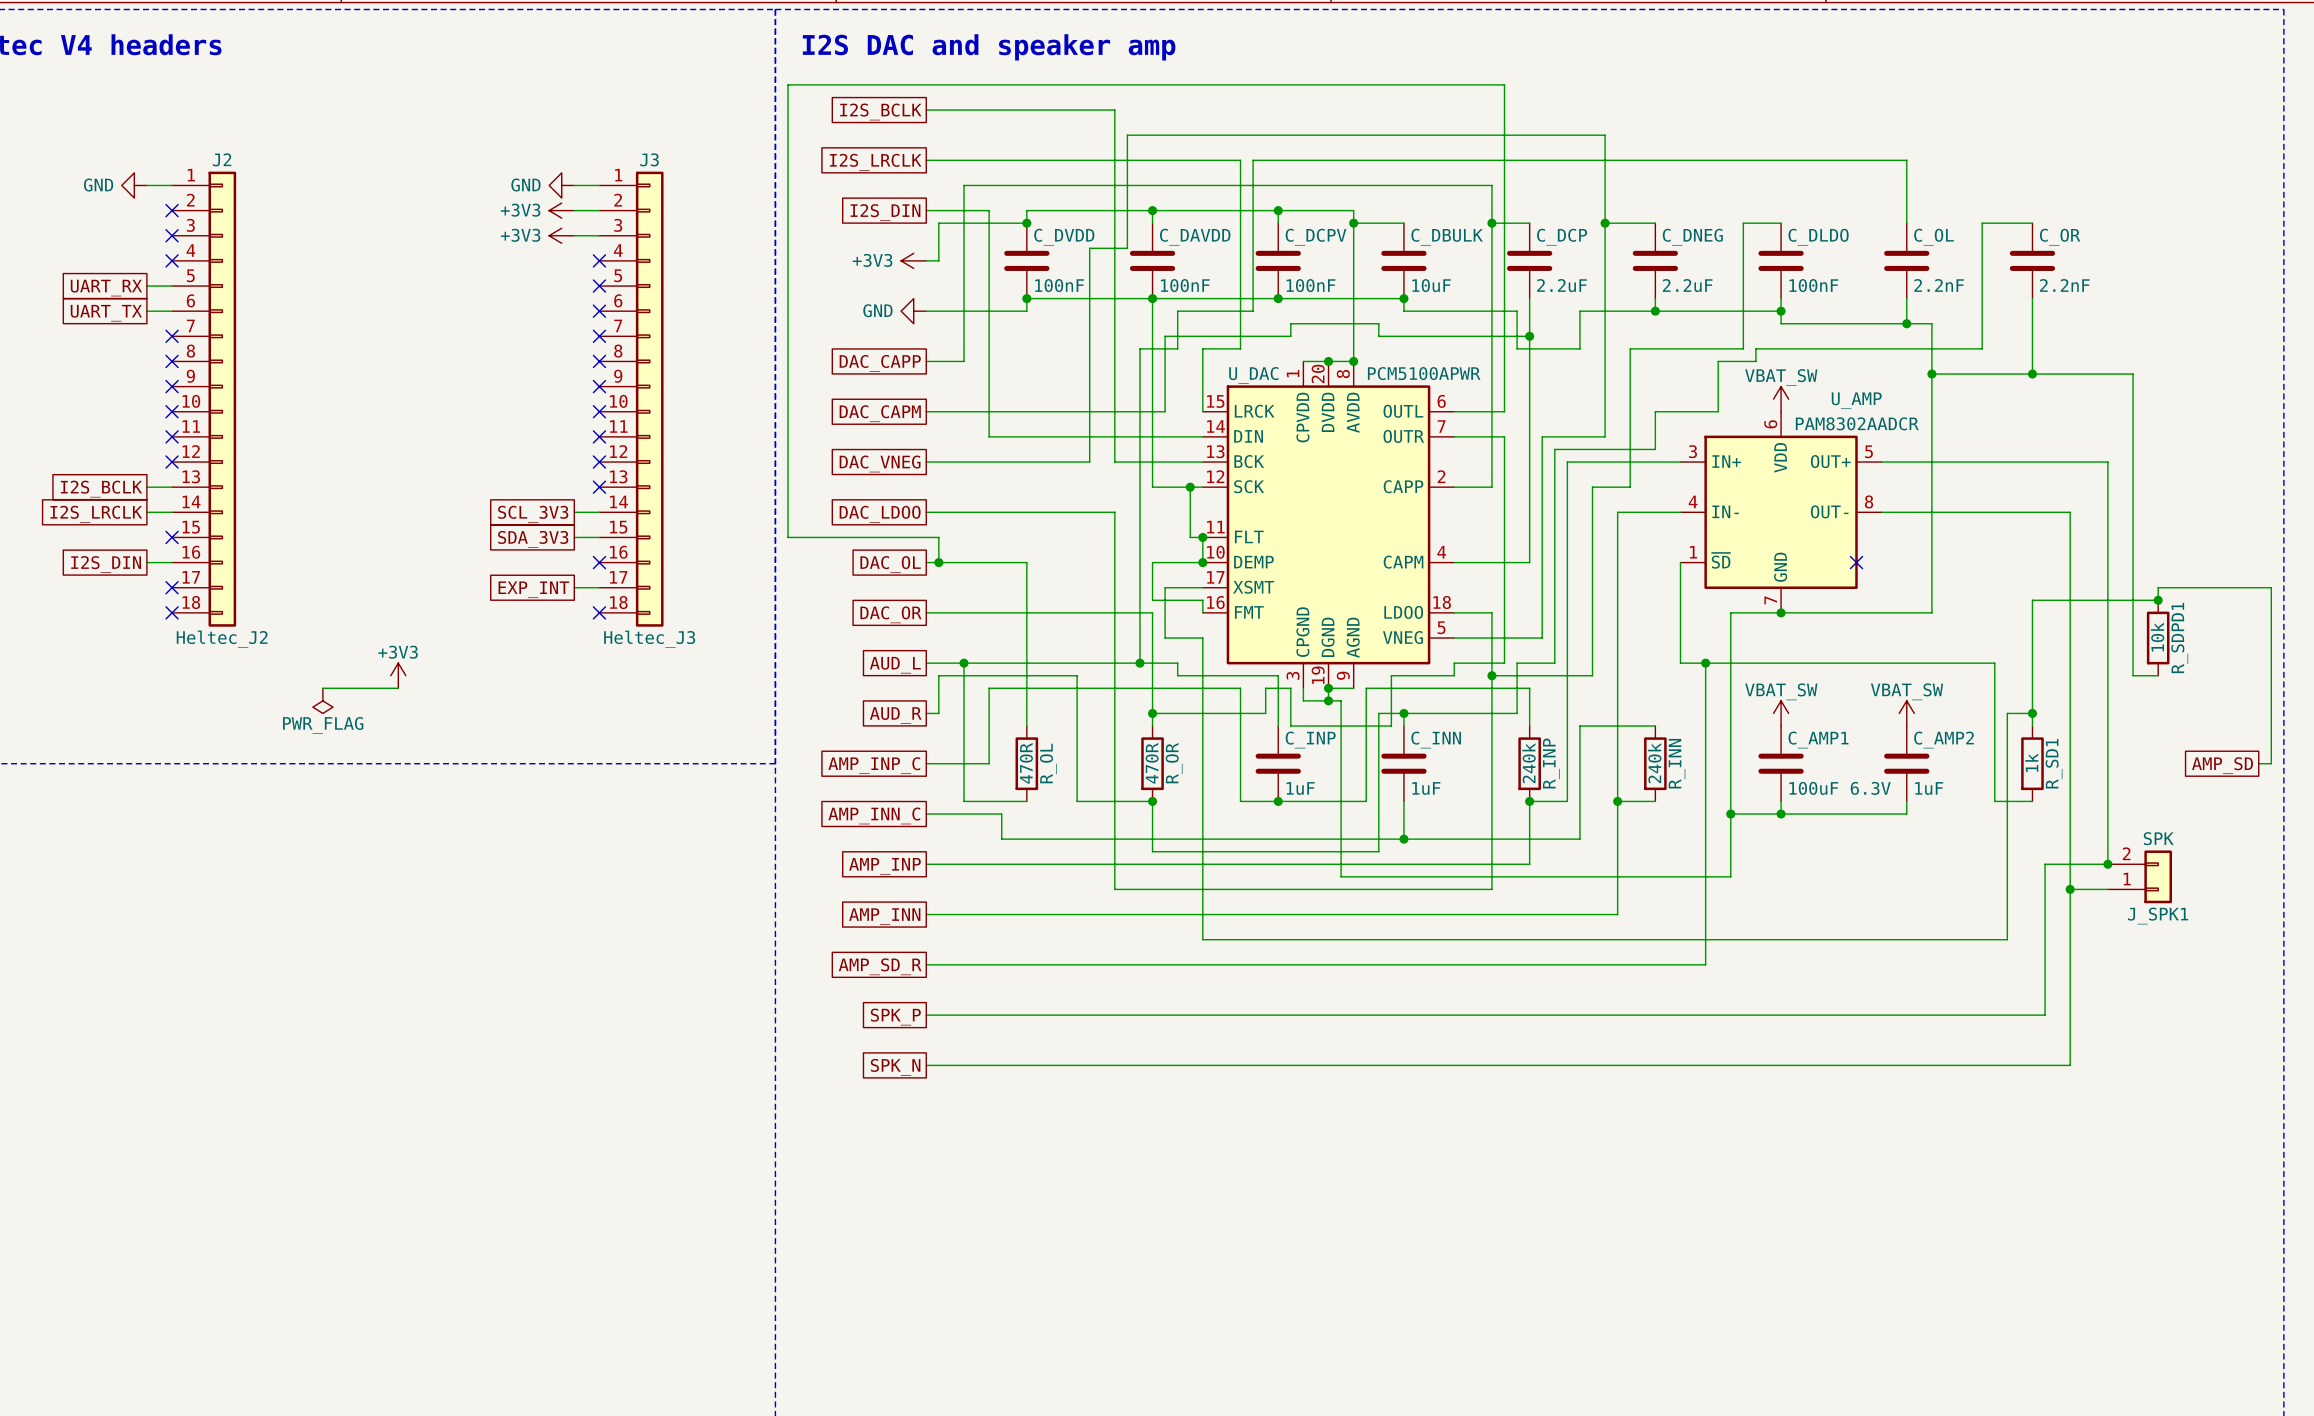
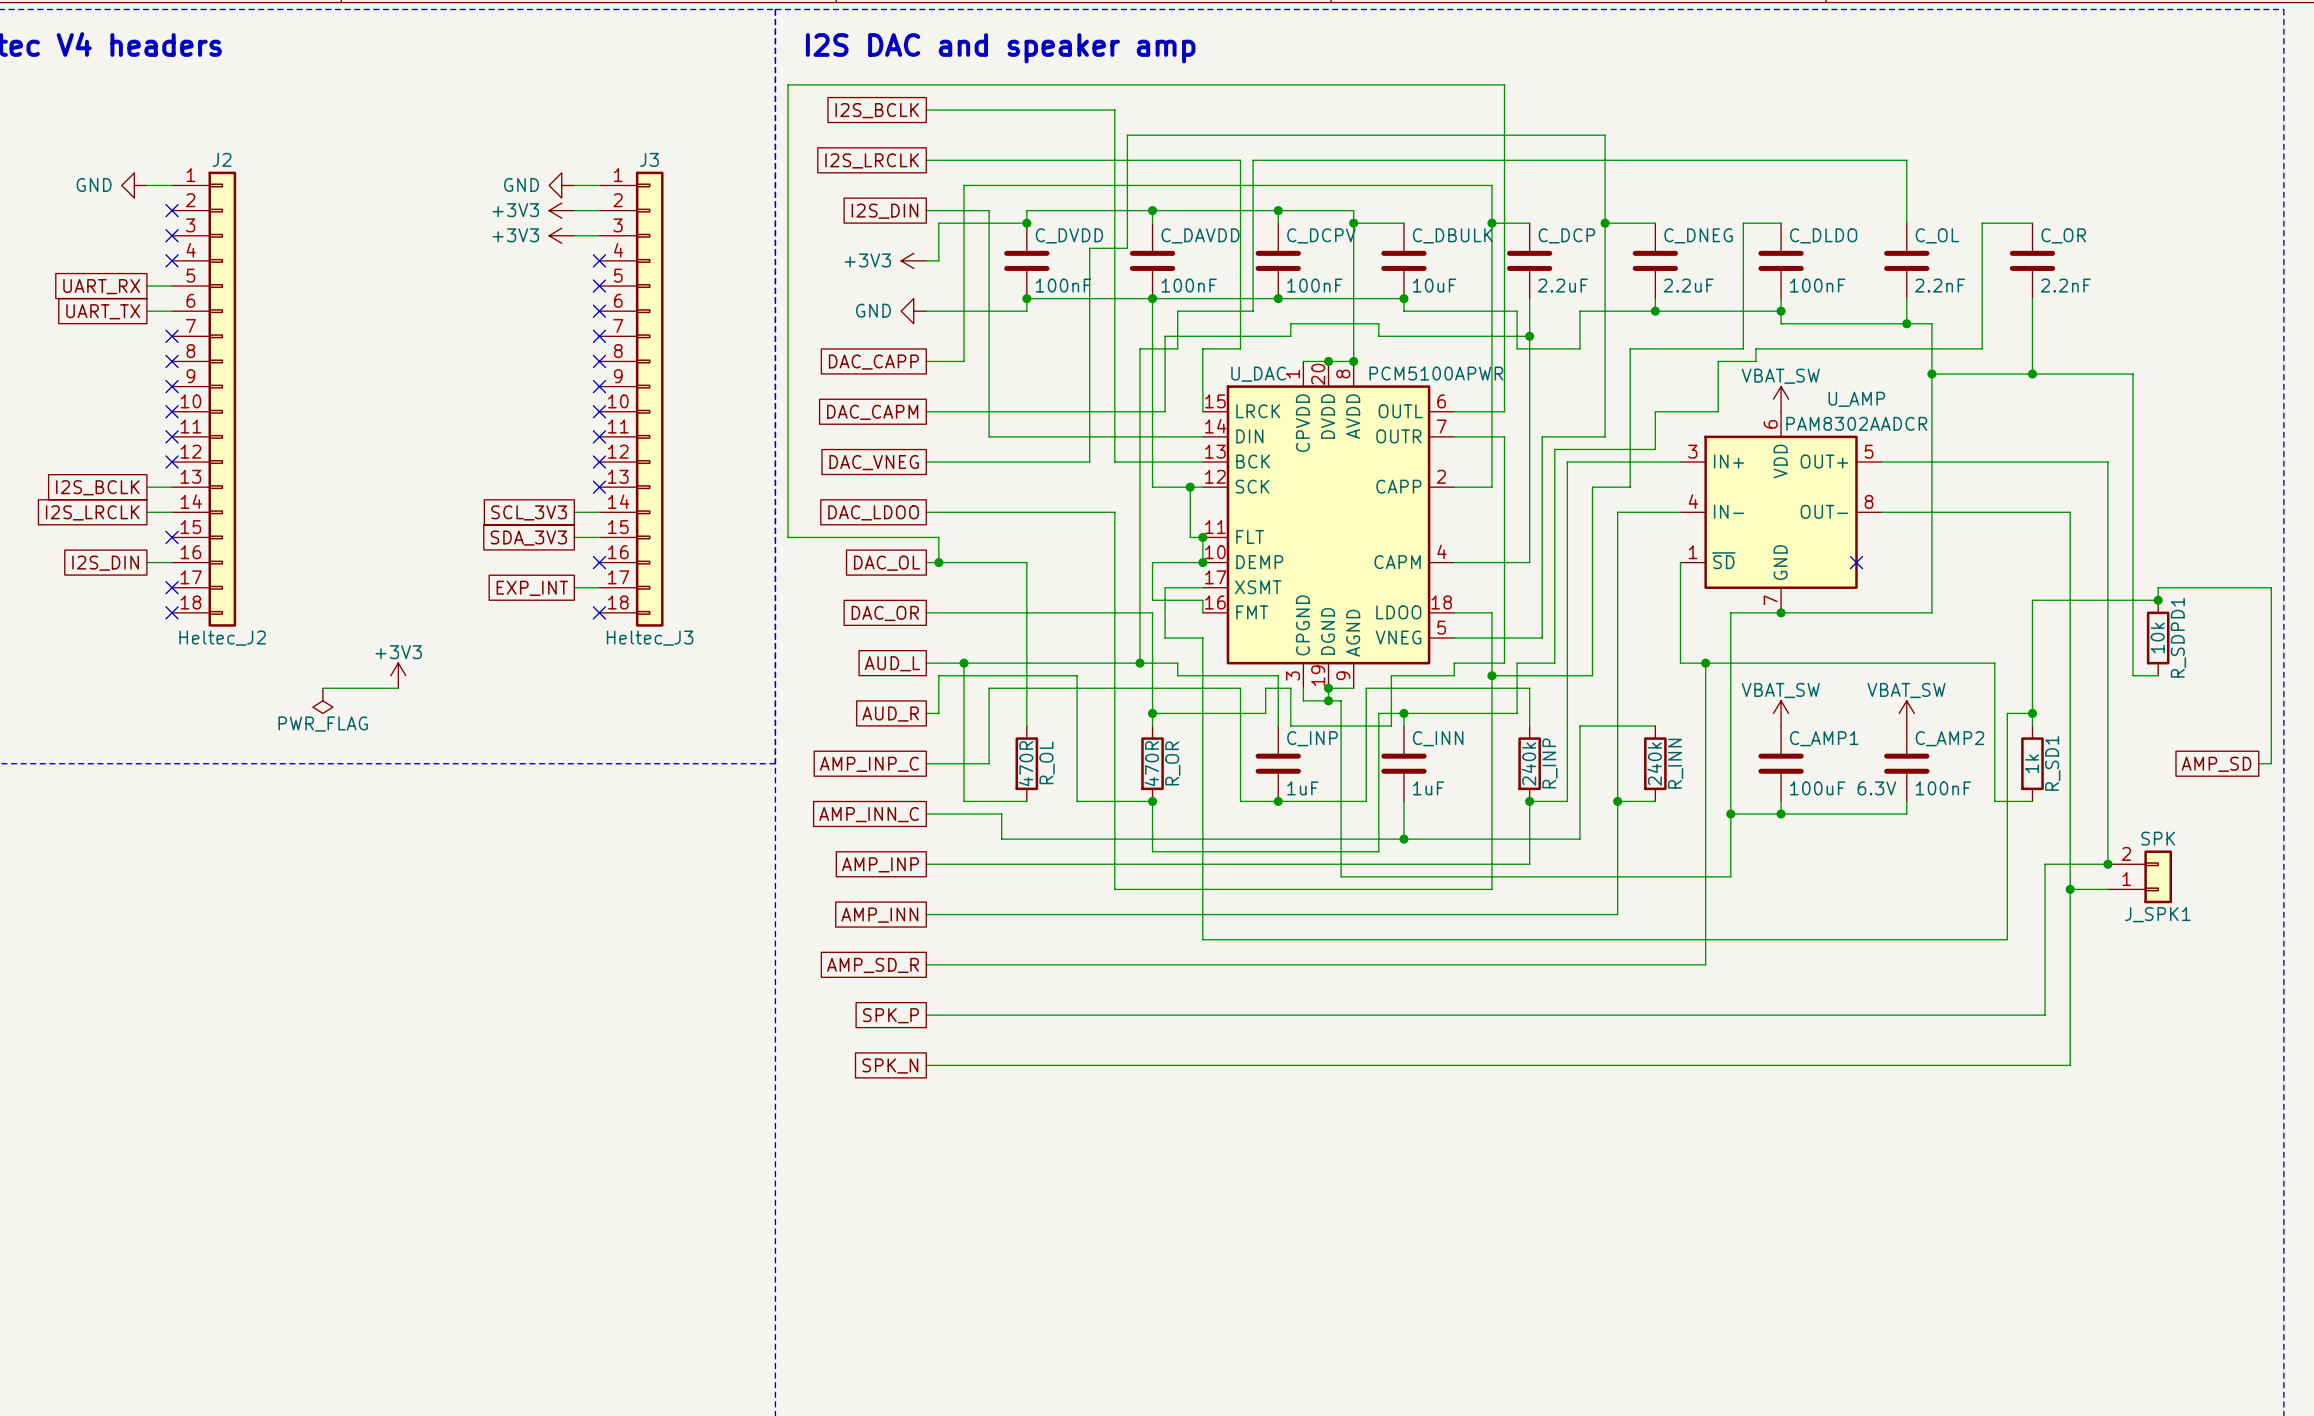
C_AMP2 value: 1uF (1929, 788) -> 100nF (1943, 788)

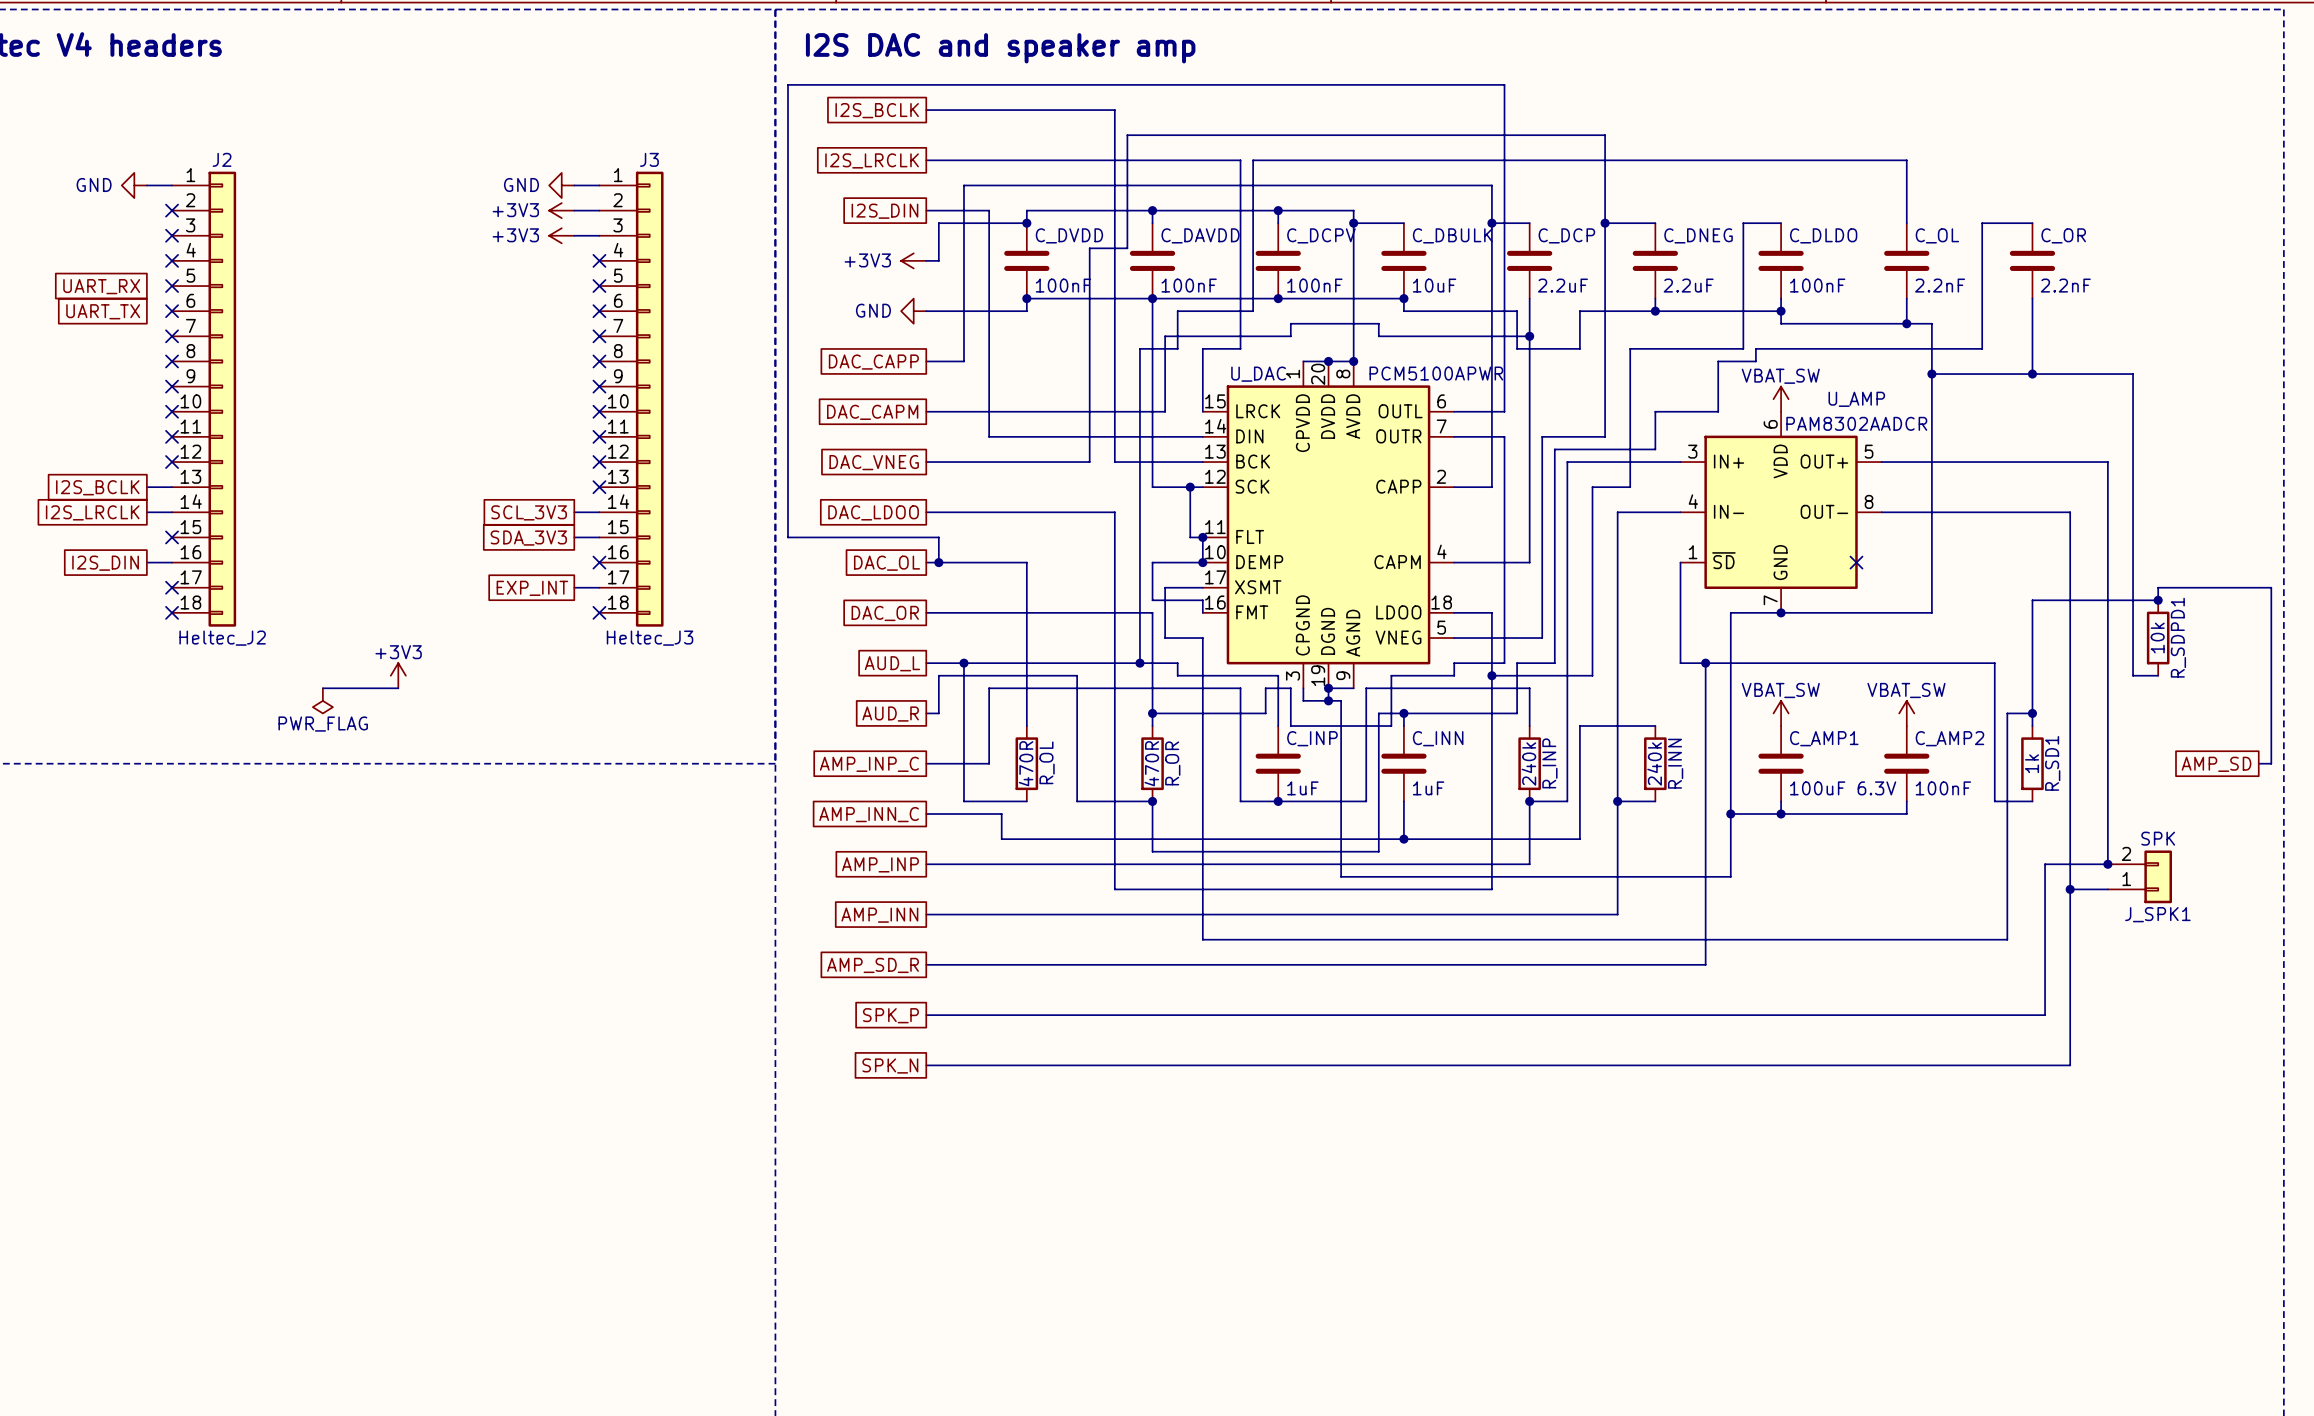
wire: (146, 286) (172, 286) -> none
no-connect mark: none -> (172, 286)
wire: (146, 311) (172, 311) -> none
no-connect mark: none -> (172, 311)

